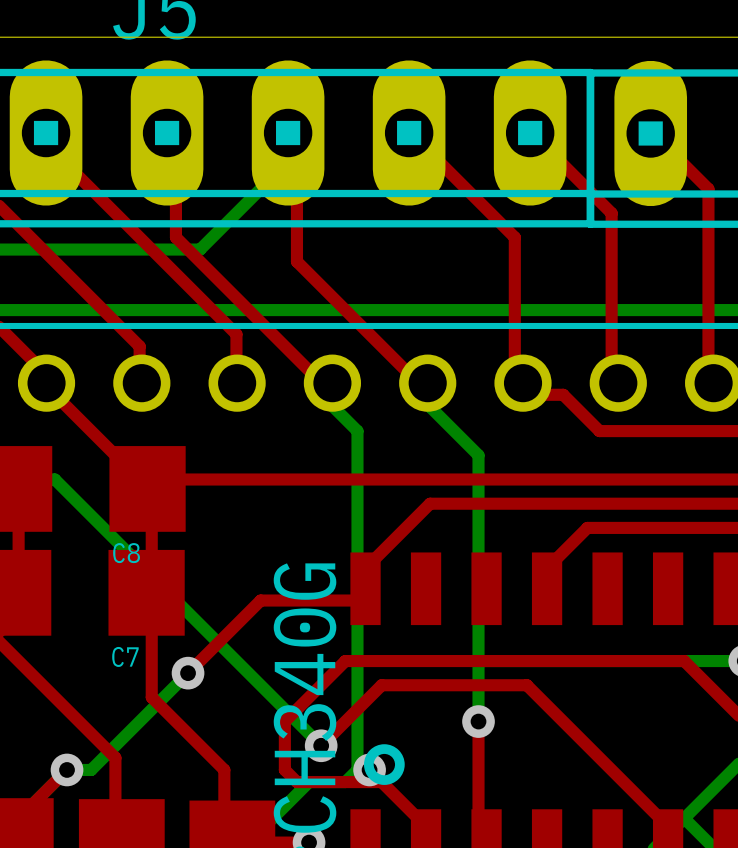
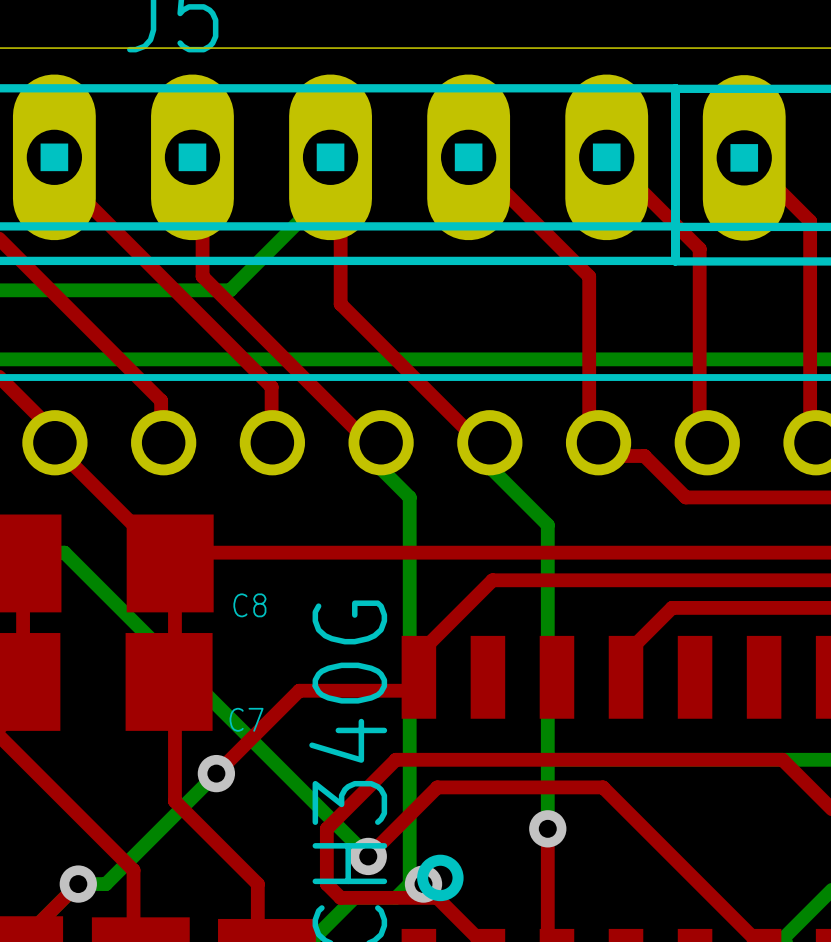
C8 name position: C8 (126, 553) -> C8 (249, 605)
C7 name position: C7 (125, 656) -> C7 (246, 719)

